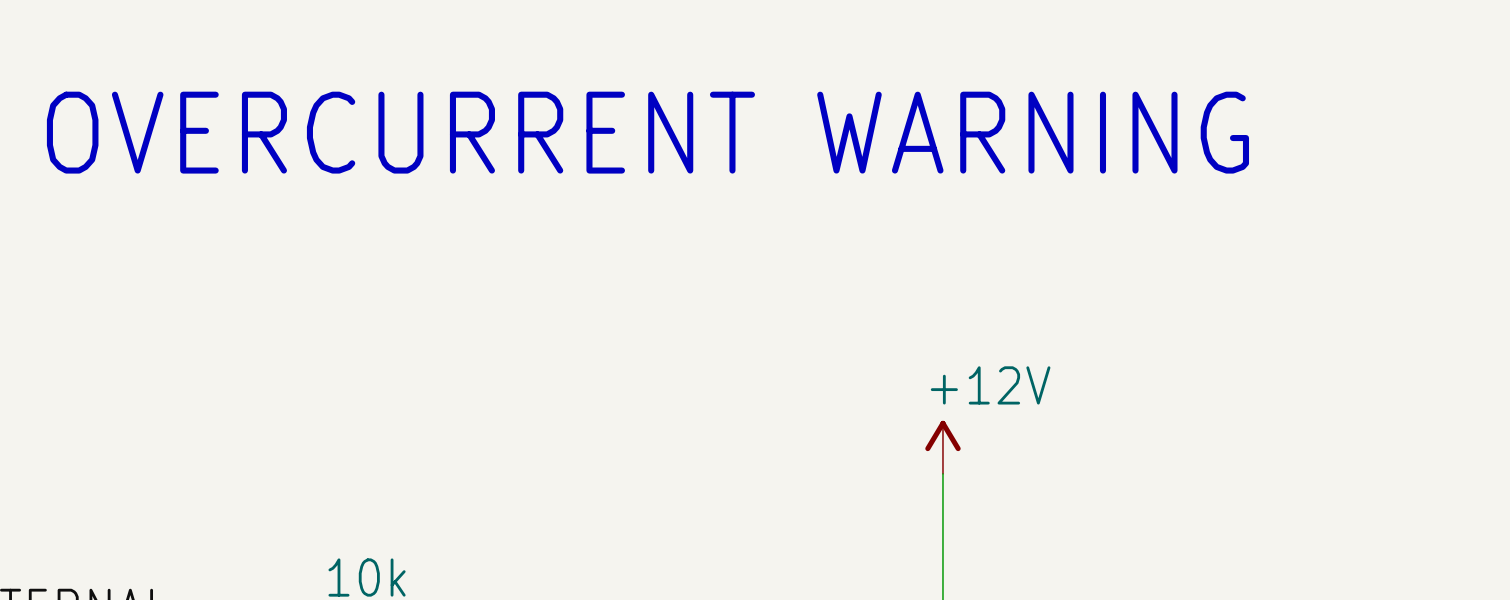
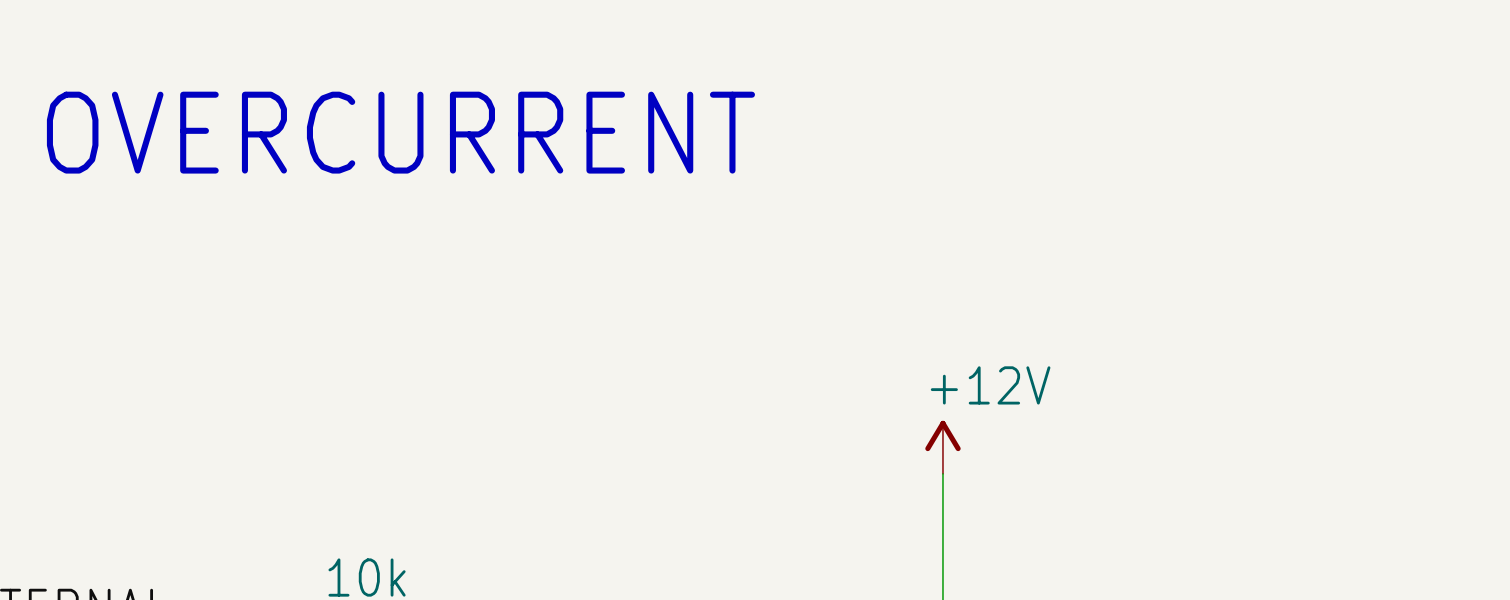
text: OVERCURRENT WARNING (647, 132) -> OVERCURRENT (400, 132)

